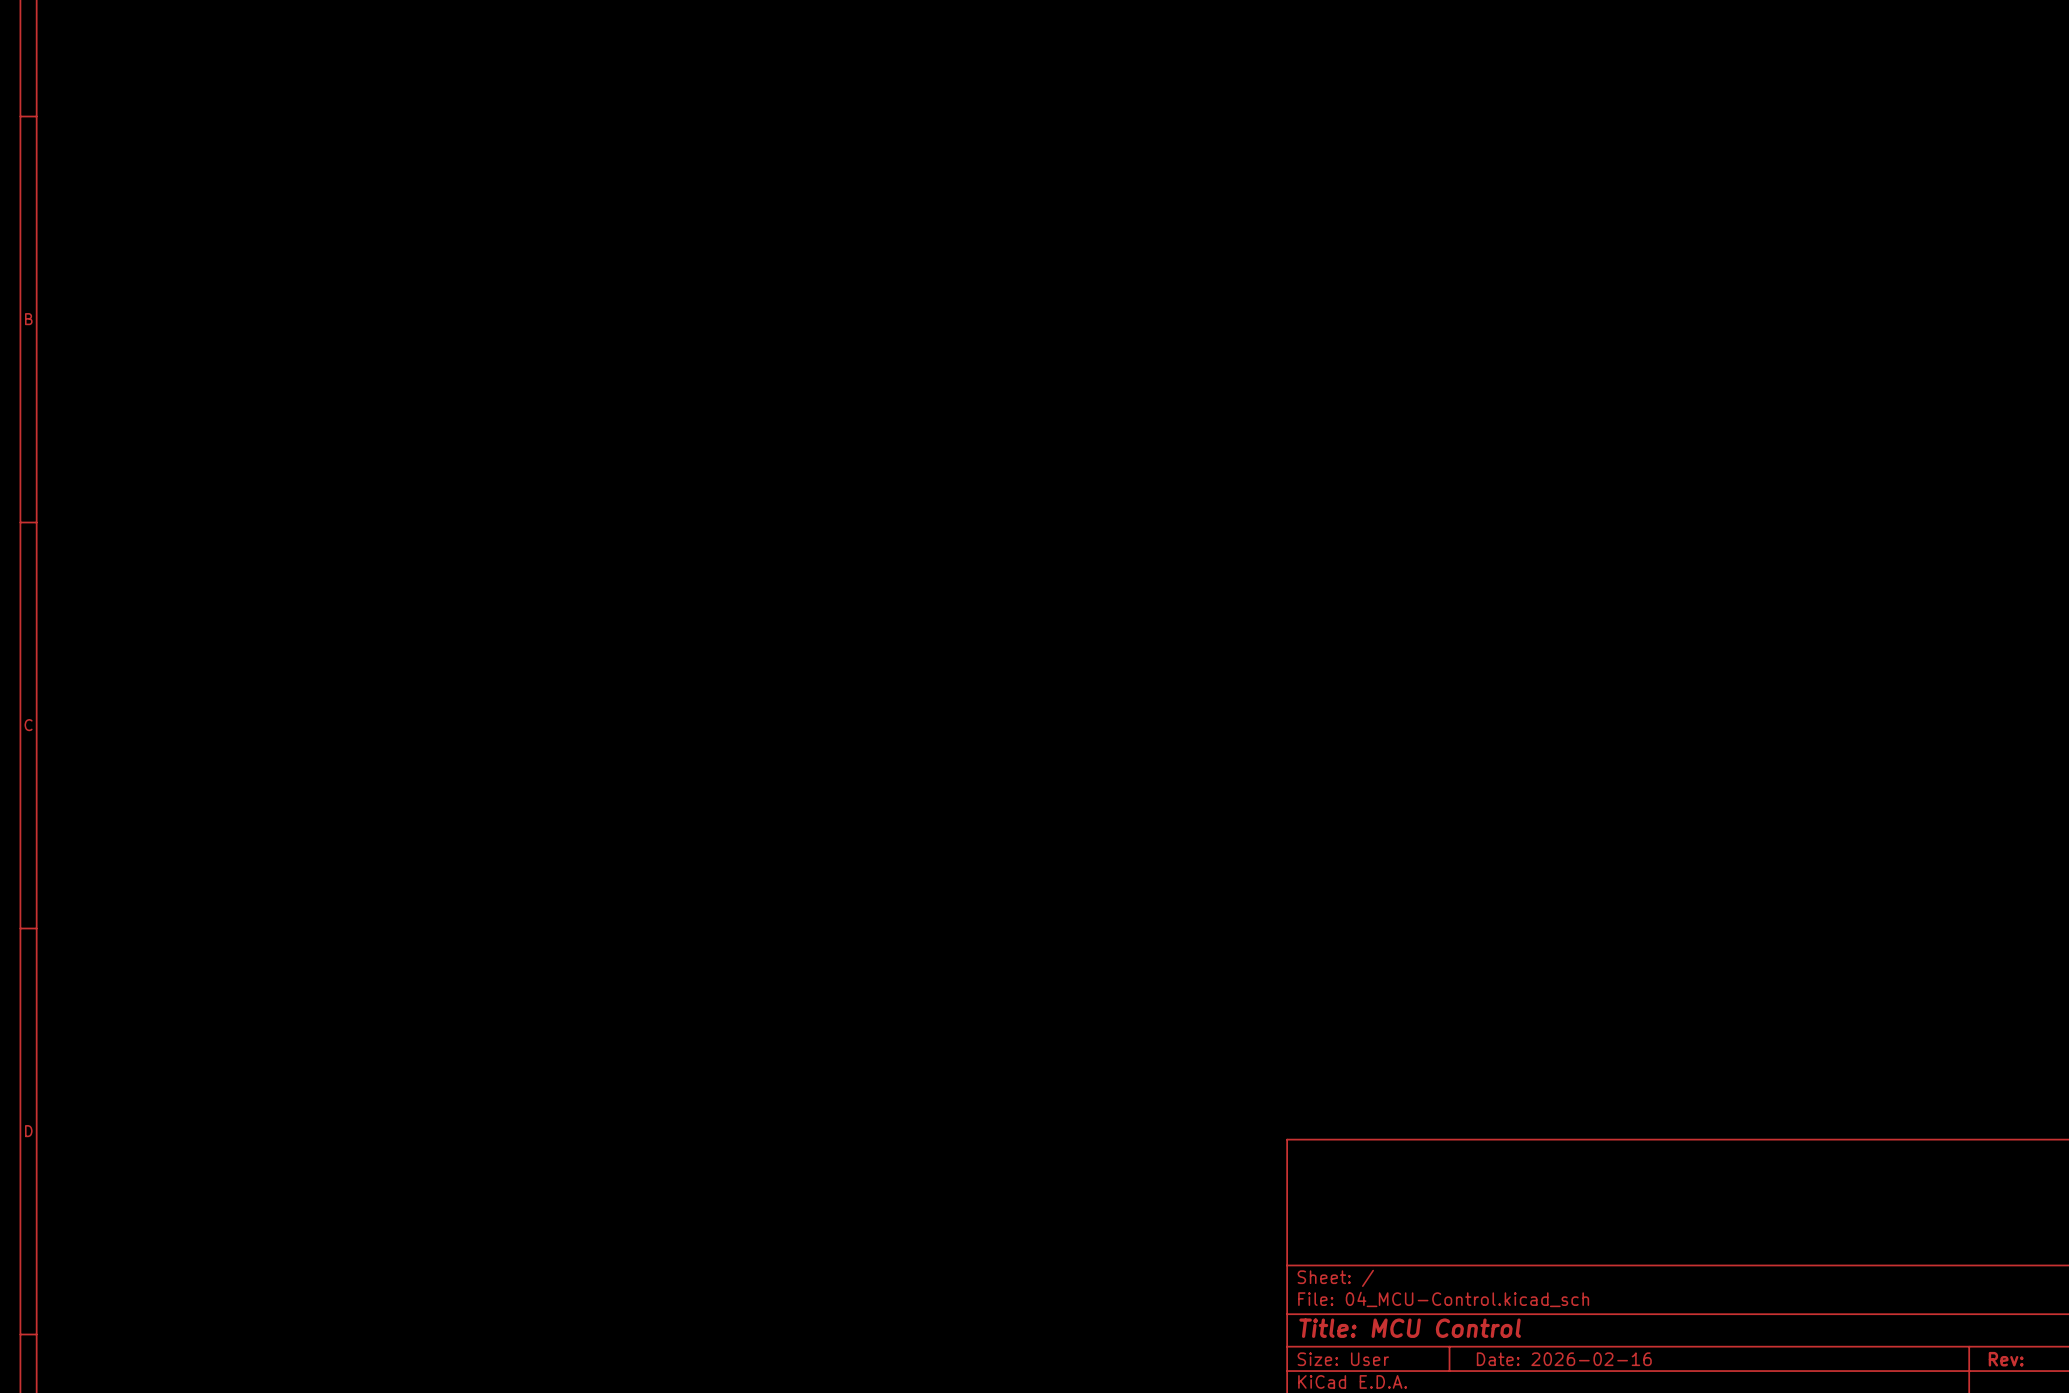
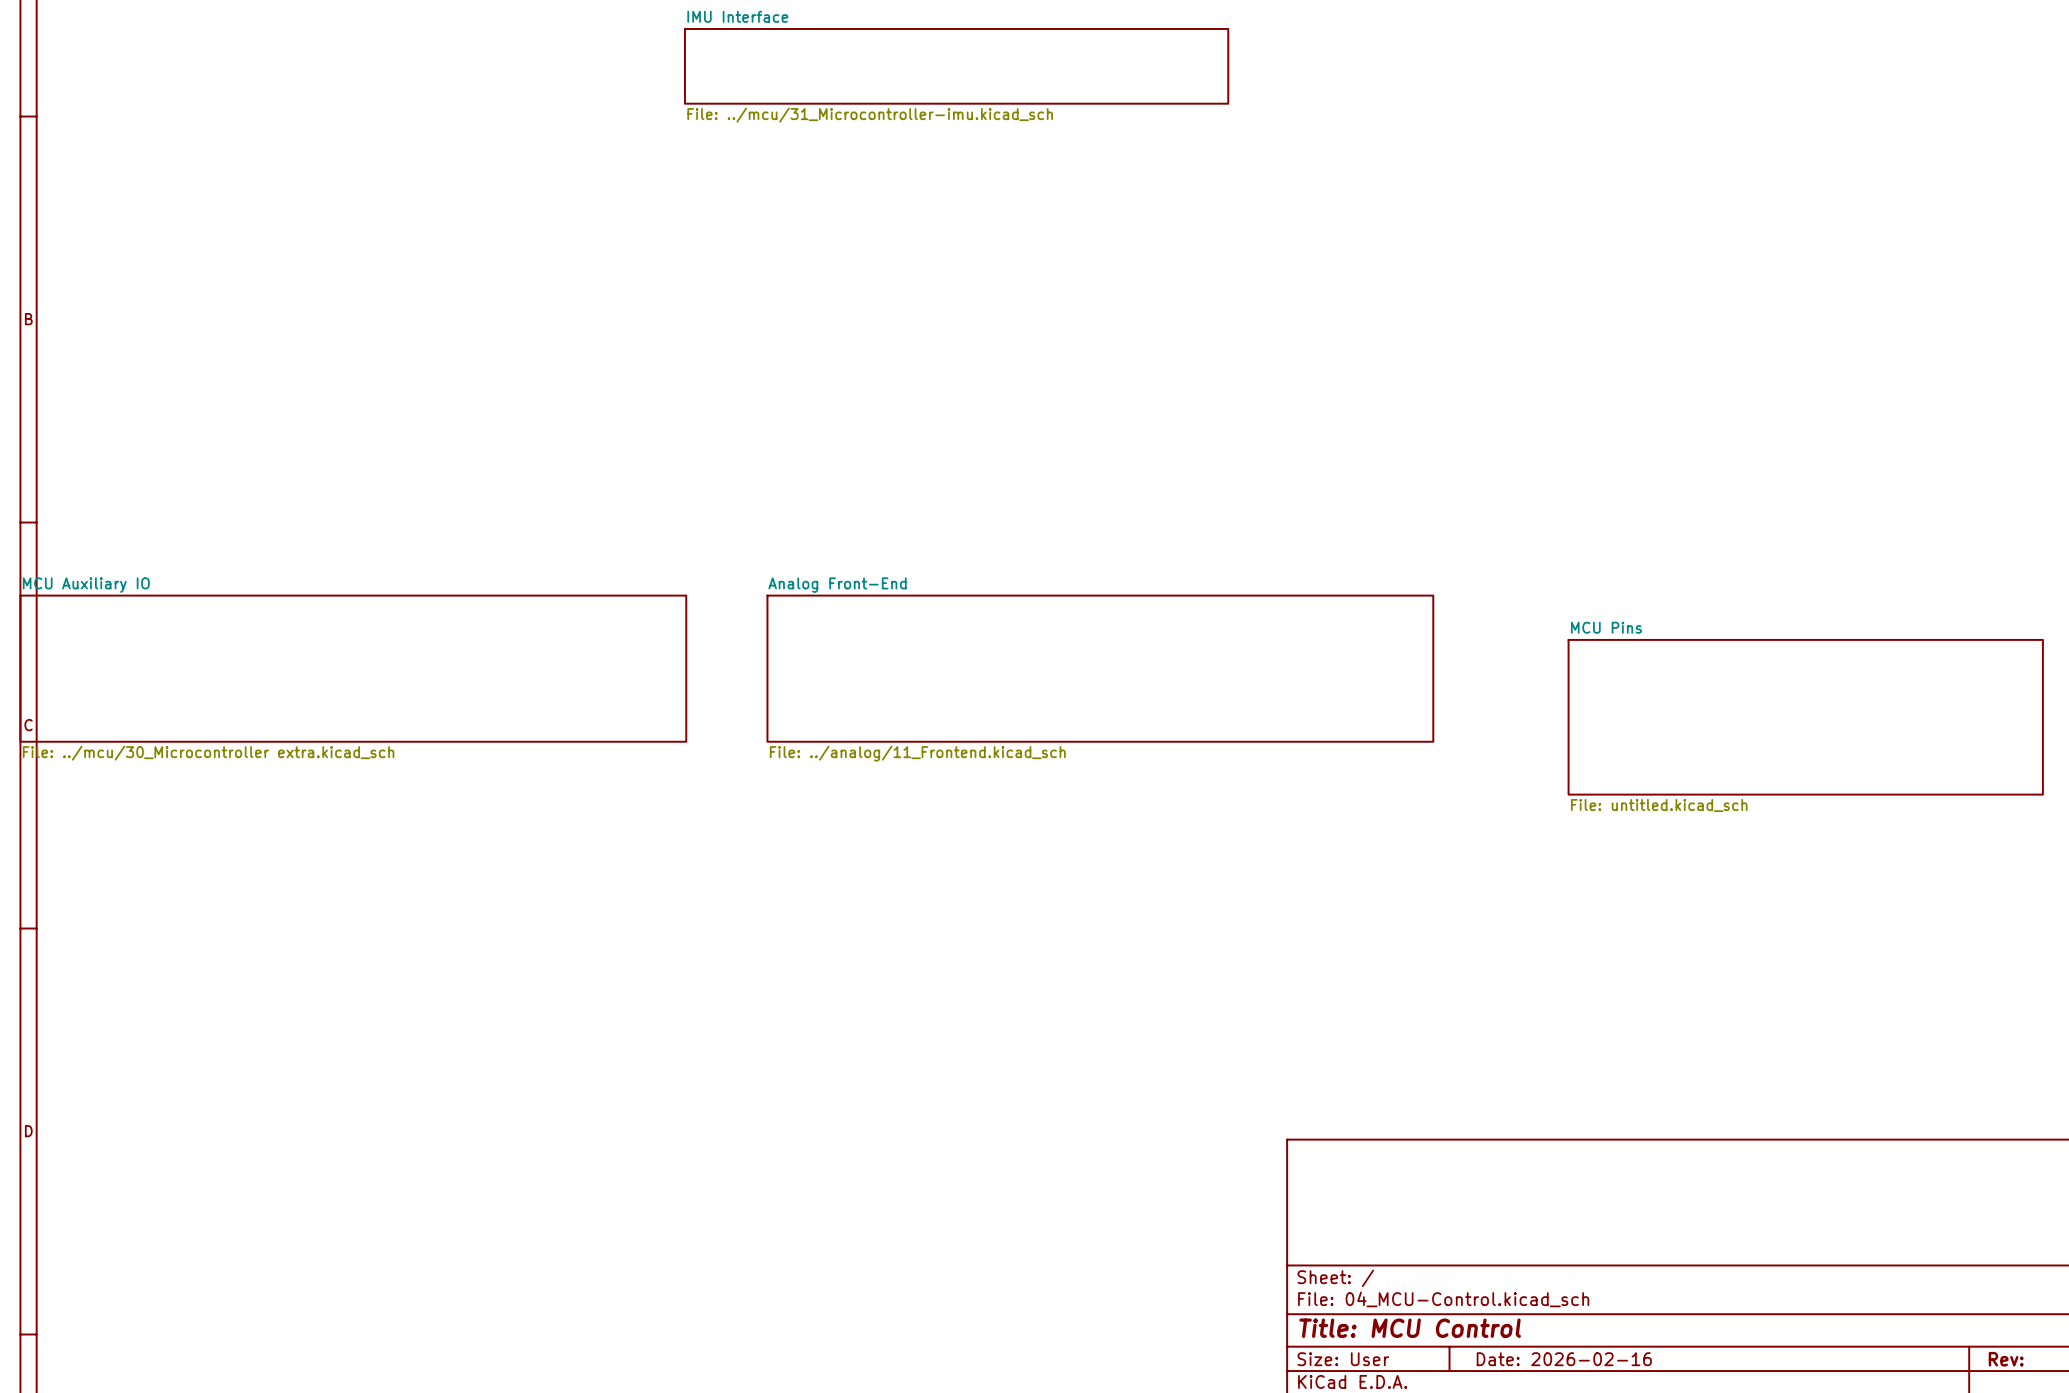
sheet IMU Interface: none -> File: ../mcu/31_Microcontroller-imu.kicad_sch (956, 66)
sheet MCU Auxiliary IO: none -> File: ../mcu/30_Microcontroller extra.kicad_sch (353, 668)
sheet Analog Front-End: none -> File: ../analog/11_Frontend.kicad_sch (1100, 668)
sheet MCU Pins: none -> File: untitled.kicad_sch (1805, 717)

